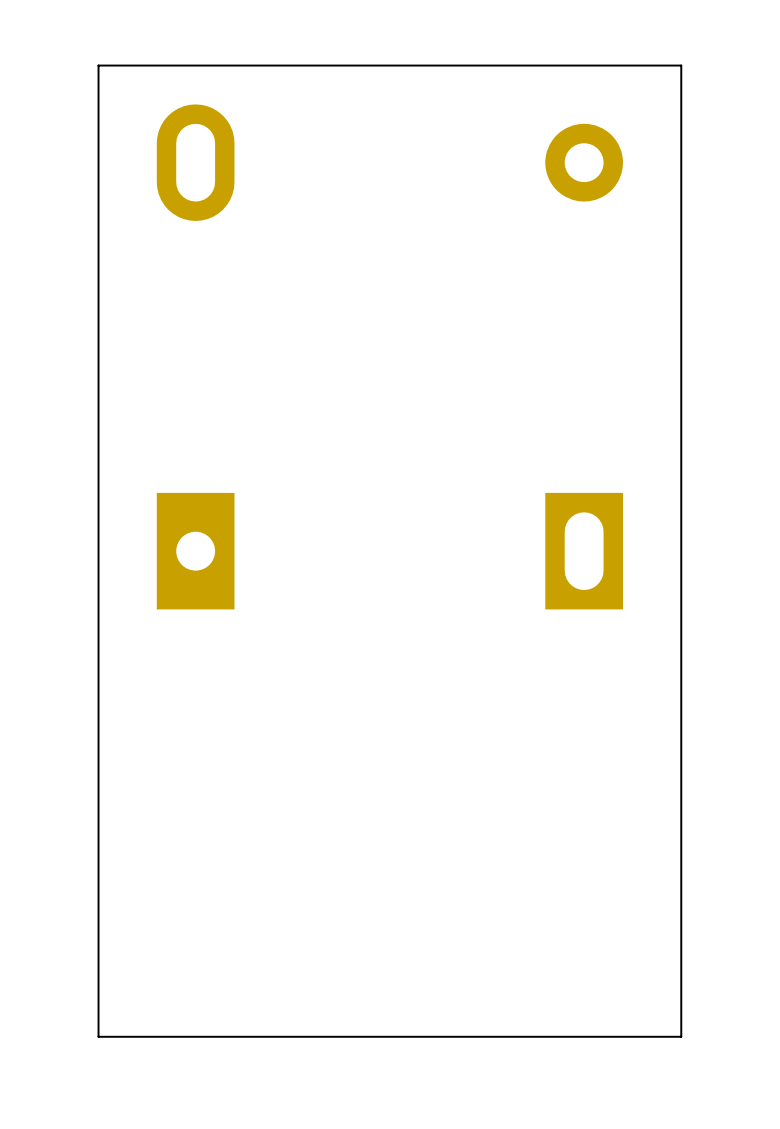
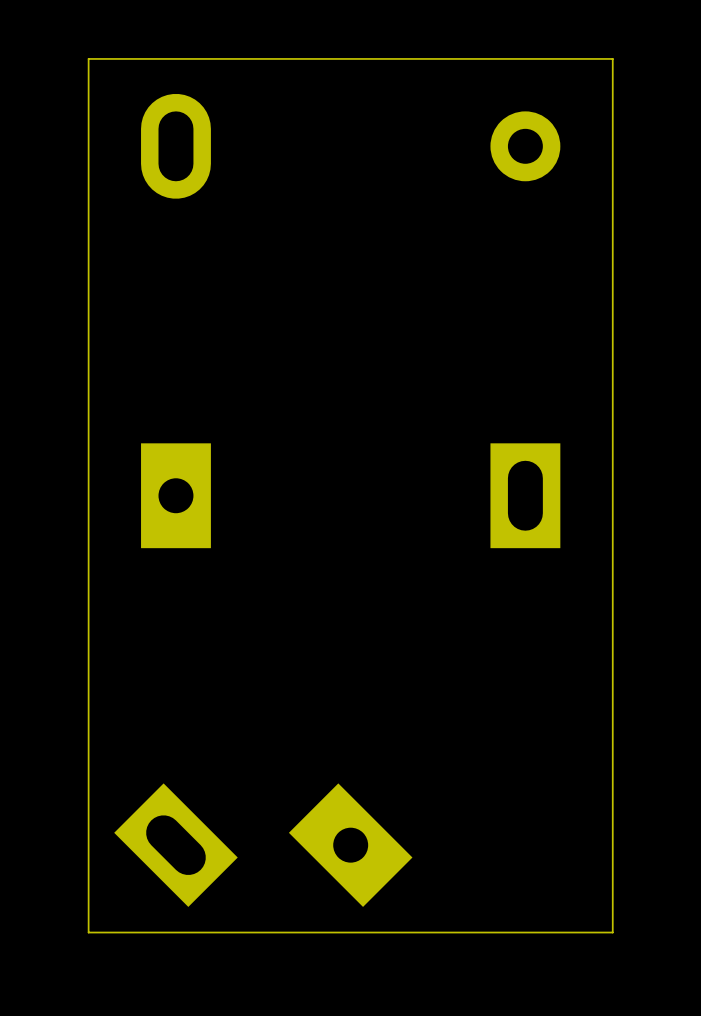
part: none -> (175, 845)
part: none -> (350, 845)

